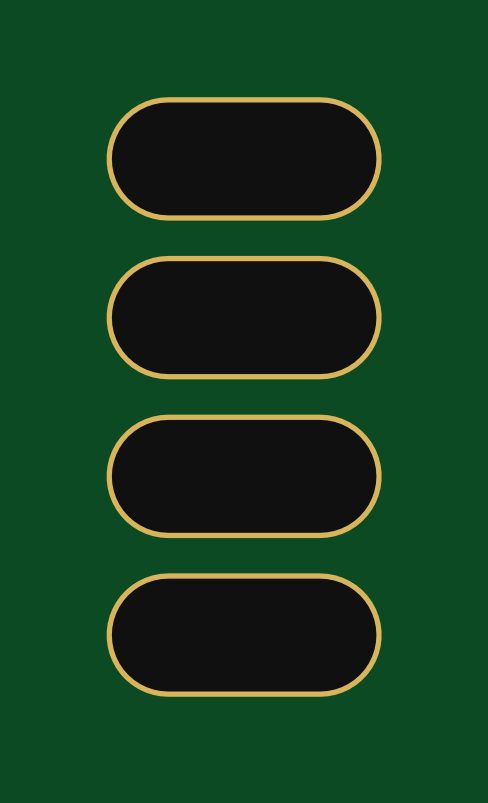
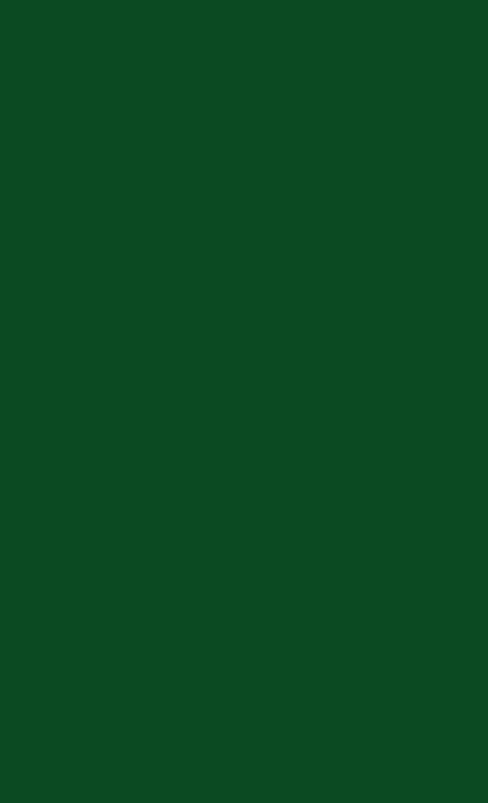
part: (244, 158) -> none
part: (244, 317) -> none
part: (244, 476) -> none
part: (244, 635) -> none

